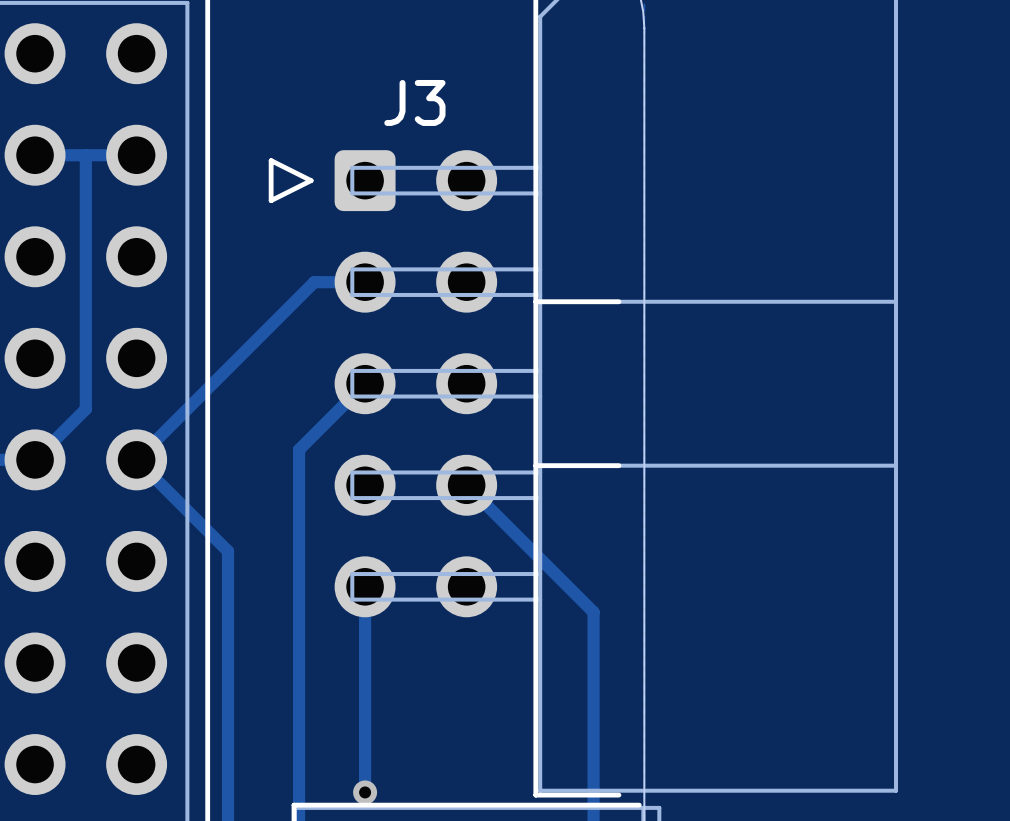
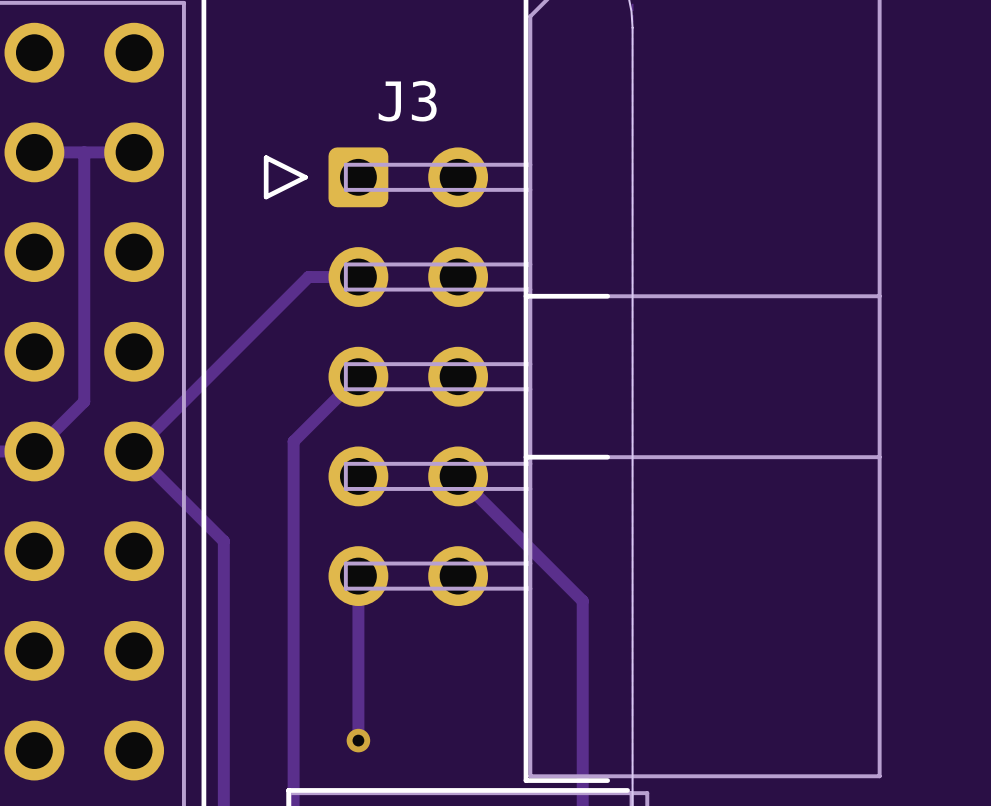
track: (365, 754) (365, 792) -> none
via position: (365, 792) -> (358, 740)

